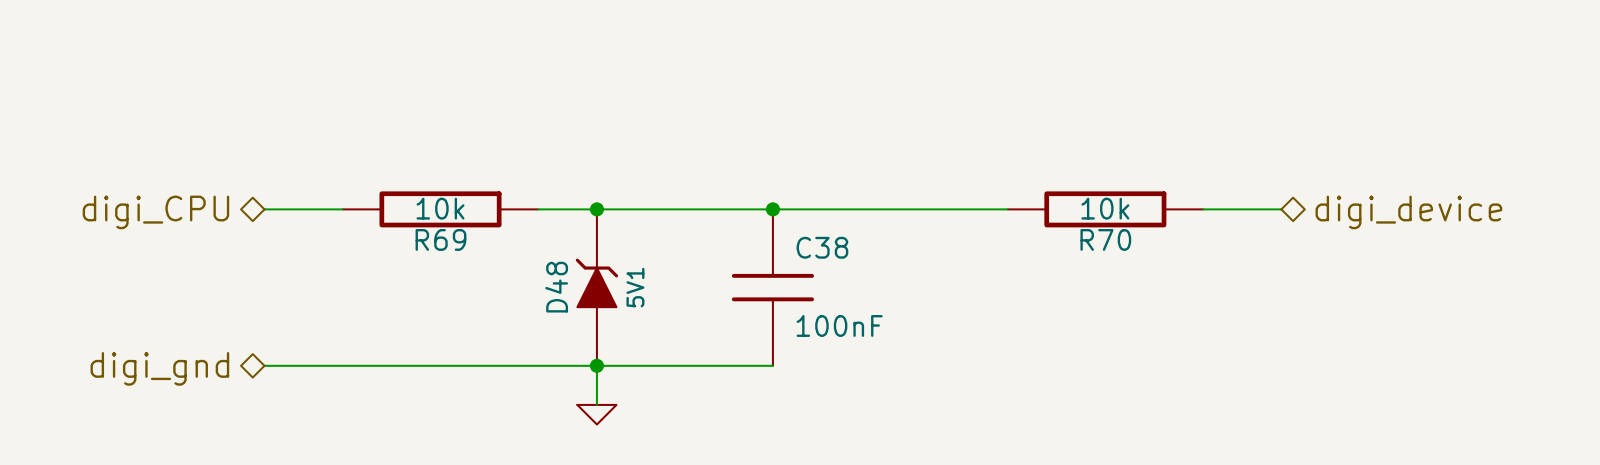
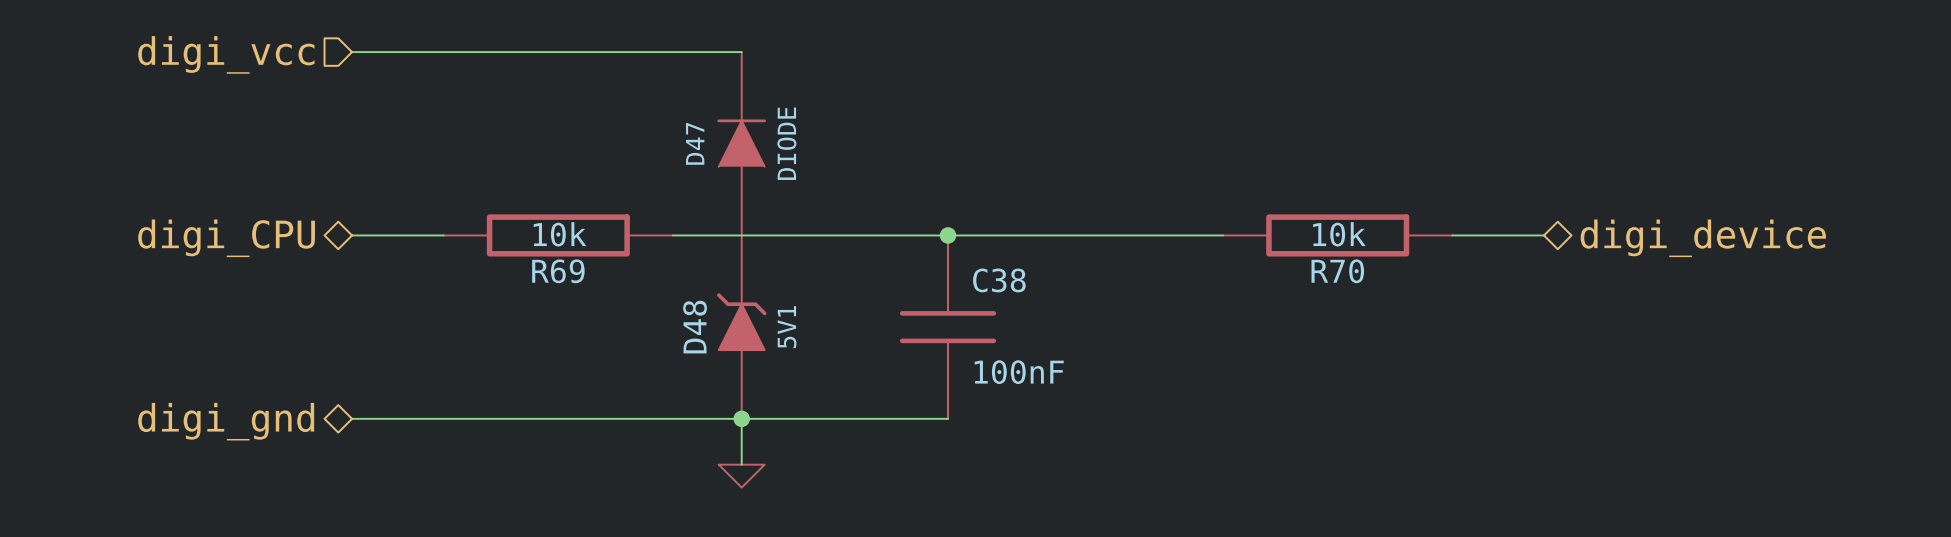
wire: none -> (352, 52) (741, 52)
hierarchical label: none -> digi_vcc (226, 54)
D47: none -> DIODE (741, 143)
junction: (596, 209) -> none

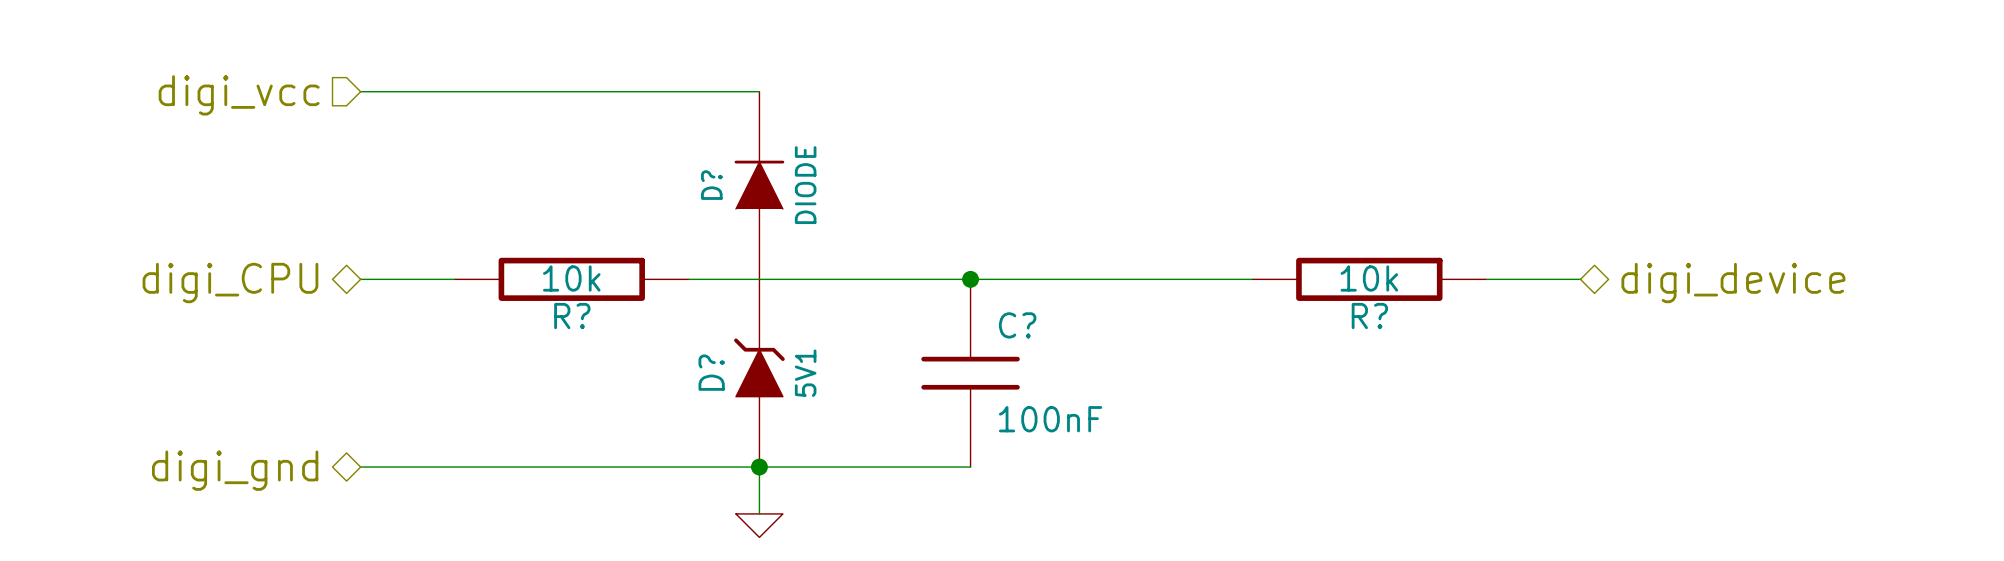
D47 name: D47 (695, 143) -> D? (711, 185)
R69 name: R69 (558, 271) -> R? (572, 316)
R70 name: R70 (1337, 271) -> R? (1369, 316)
C38 name: C38 (999, 280) -> C? (1017, 325)
D48 name: D48 (695, 327) -> D? (711, 372)

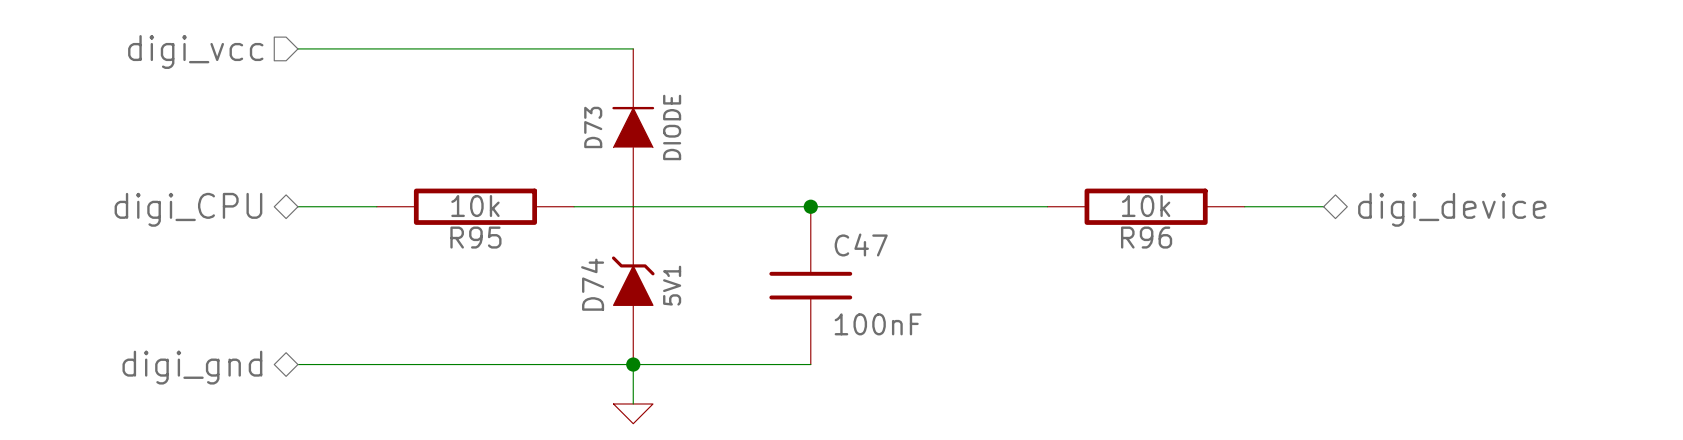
D? name: D? (711, 185) -> D73 (593, 127)
R? name: R? (572, 316) -> R95 (475, 237)
R? name: R? (1369, 316) -> R96 (1146, 237)
C? name: C? (1017, 325) -> C47 (861, 244)
D? name: D? (711, 372) -> D74 (592, 284)

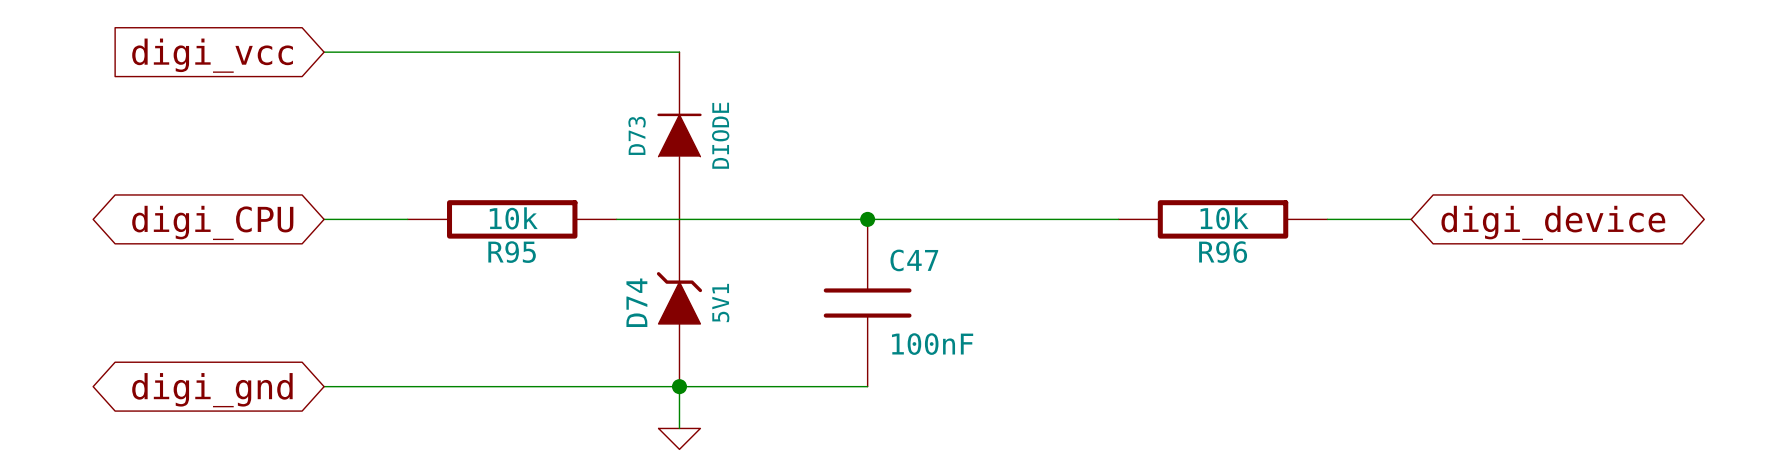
hierarchical label: digi_vcc (195, 52) -> none
global label: none -> digi_vcc (212, 55)
hierarchical label: digi_CPU (188, 209) -> none
hierarchical label: digi_device (1452, 209) -> none
global label: none -> digi_CPU (212, 222)
global label: none -> digi_device (1553, 222)
hierarchical label: digi_gnd (192, 367) -> none
global label: none -> digi_gnd (212, 390)

